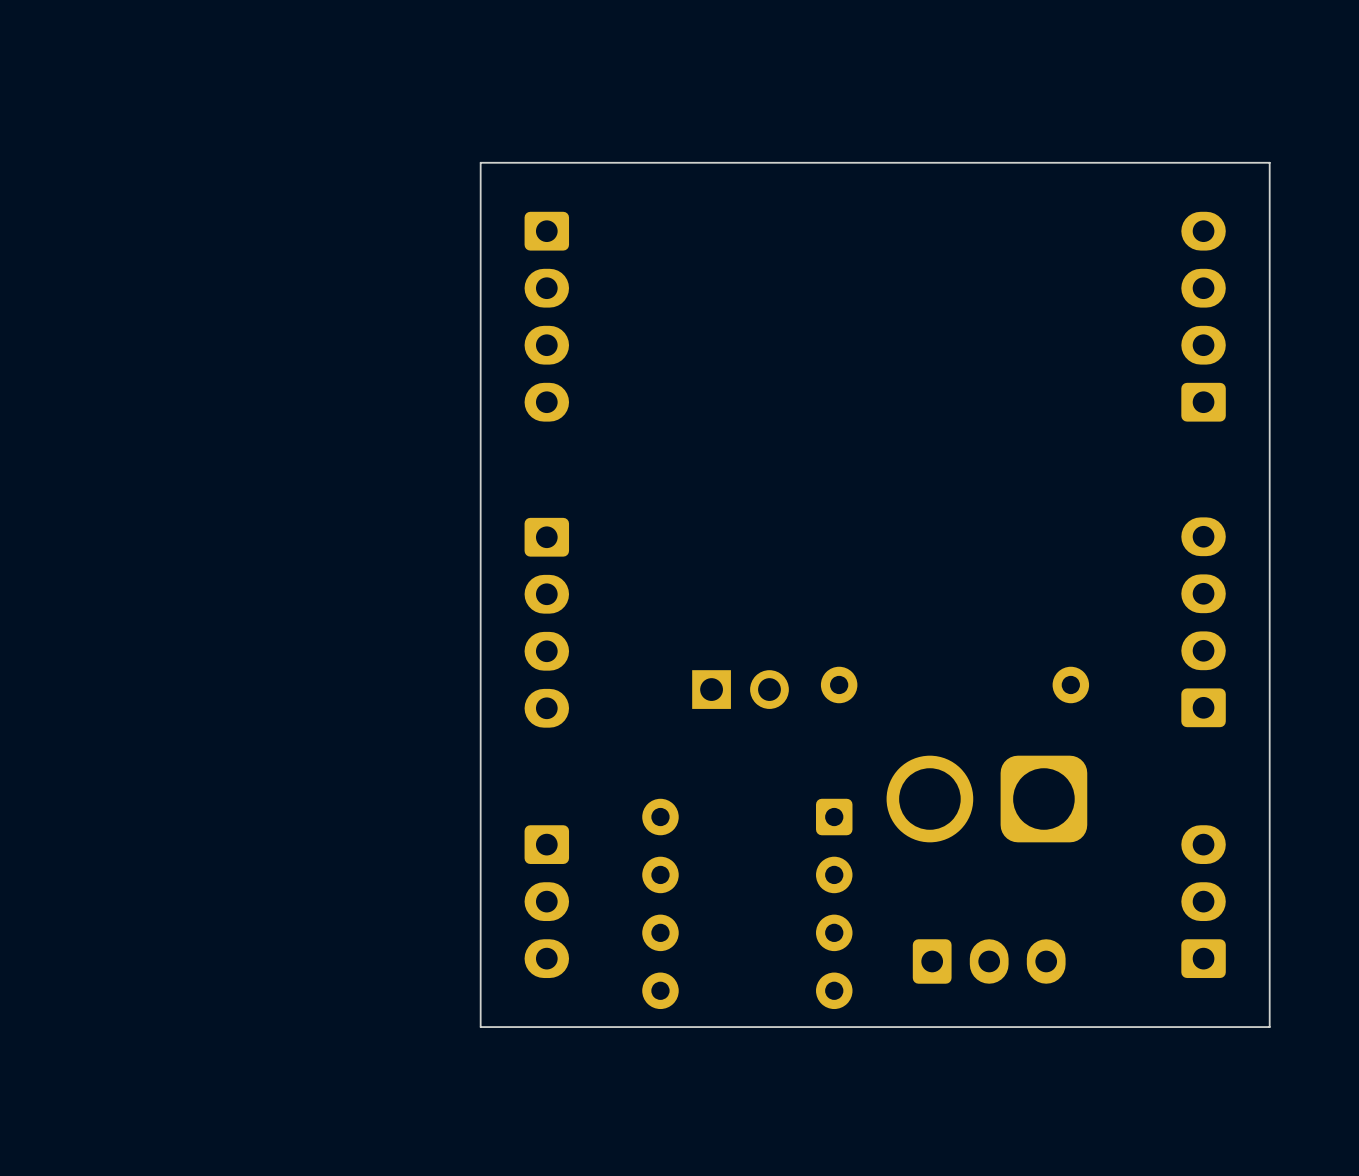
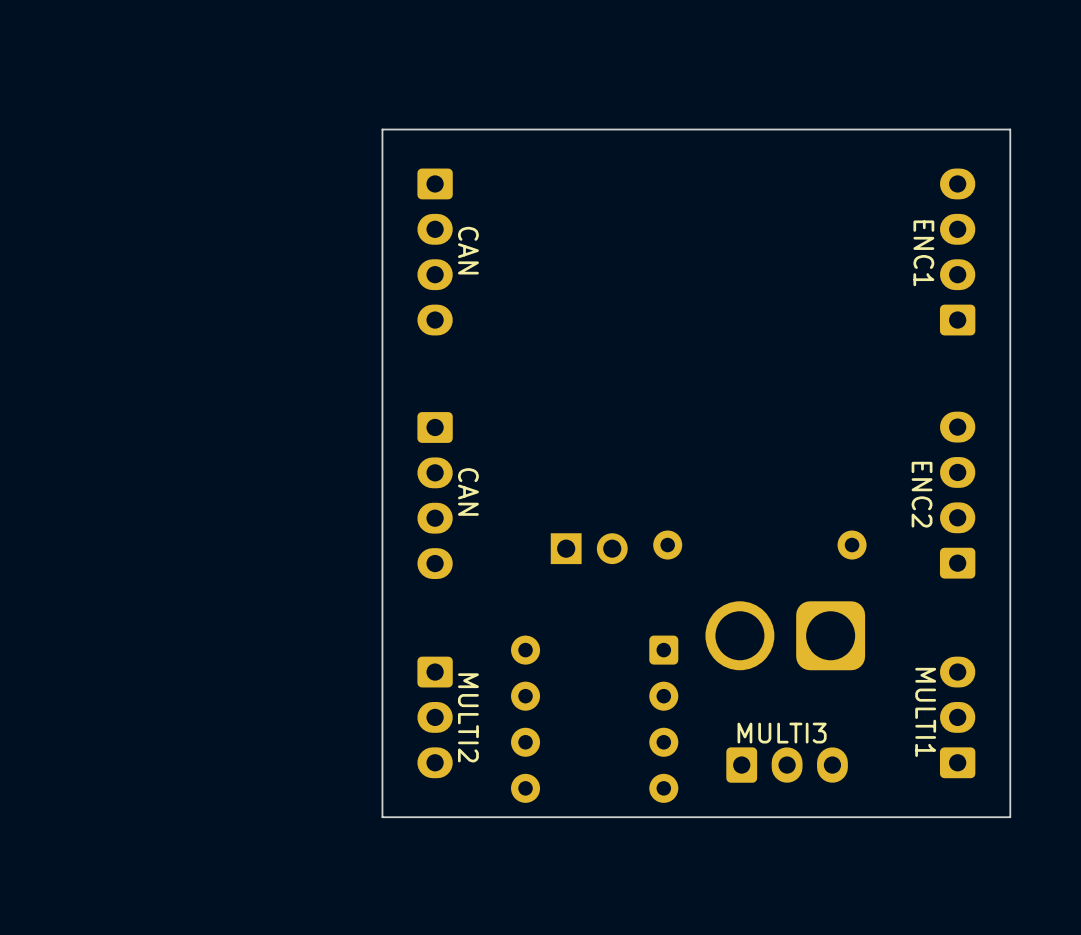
text: none -> CAN (468, 250)
text: none -> ENC1 (923, 253)
text: none -> CAN (468, 491)
text: none -> ENC2 (922, 494)
text: none -> MULTI1 (925, 712)
text: none -> MULTI2 (468, 717)
text: none -> MULTI3 (782, 733)

